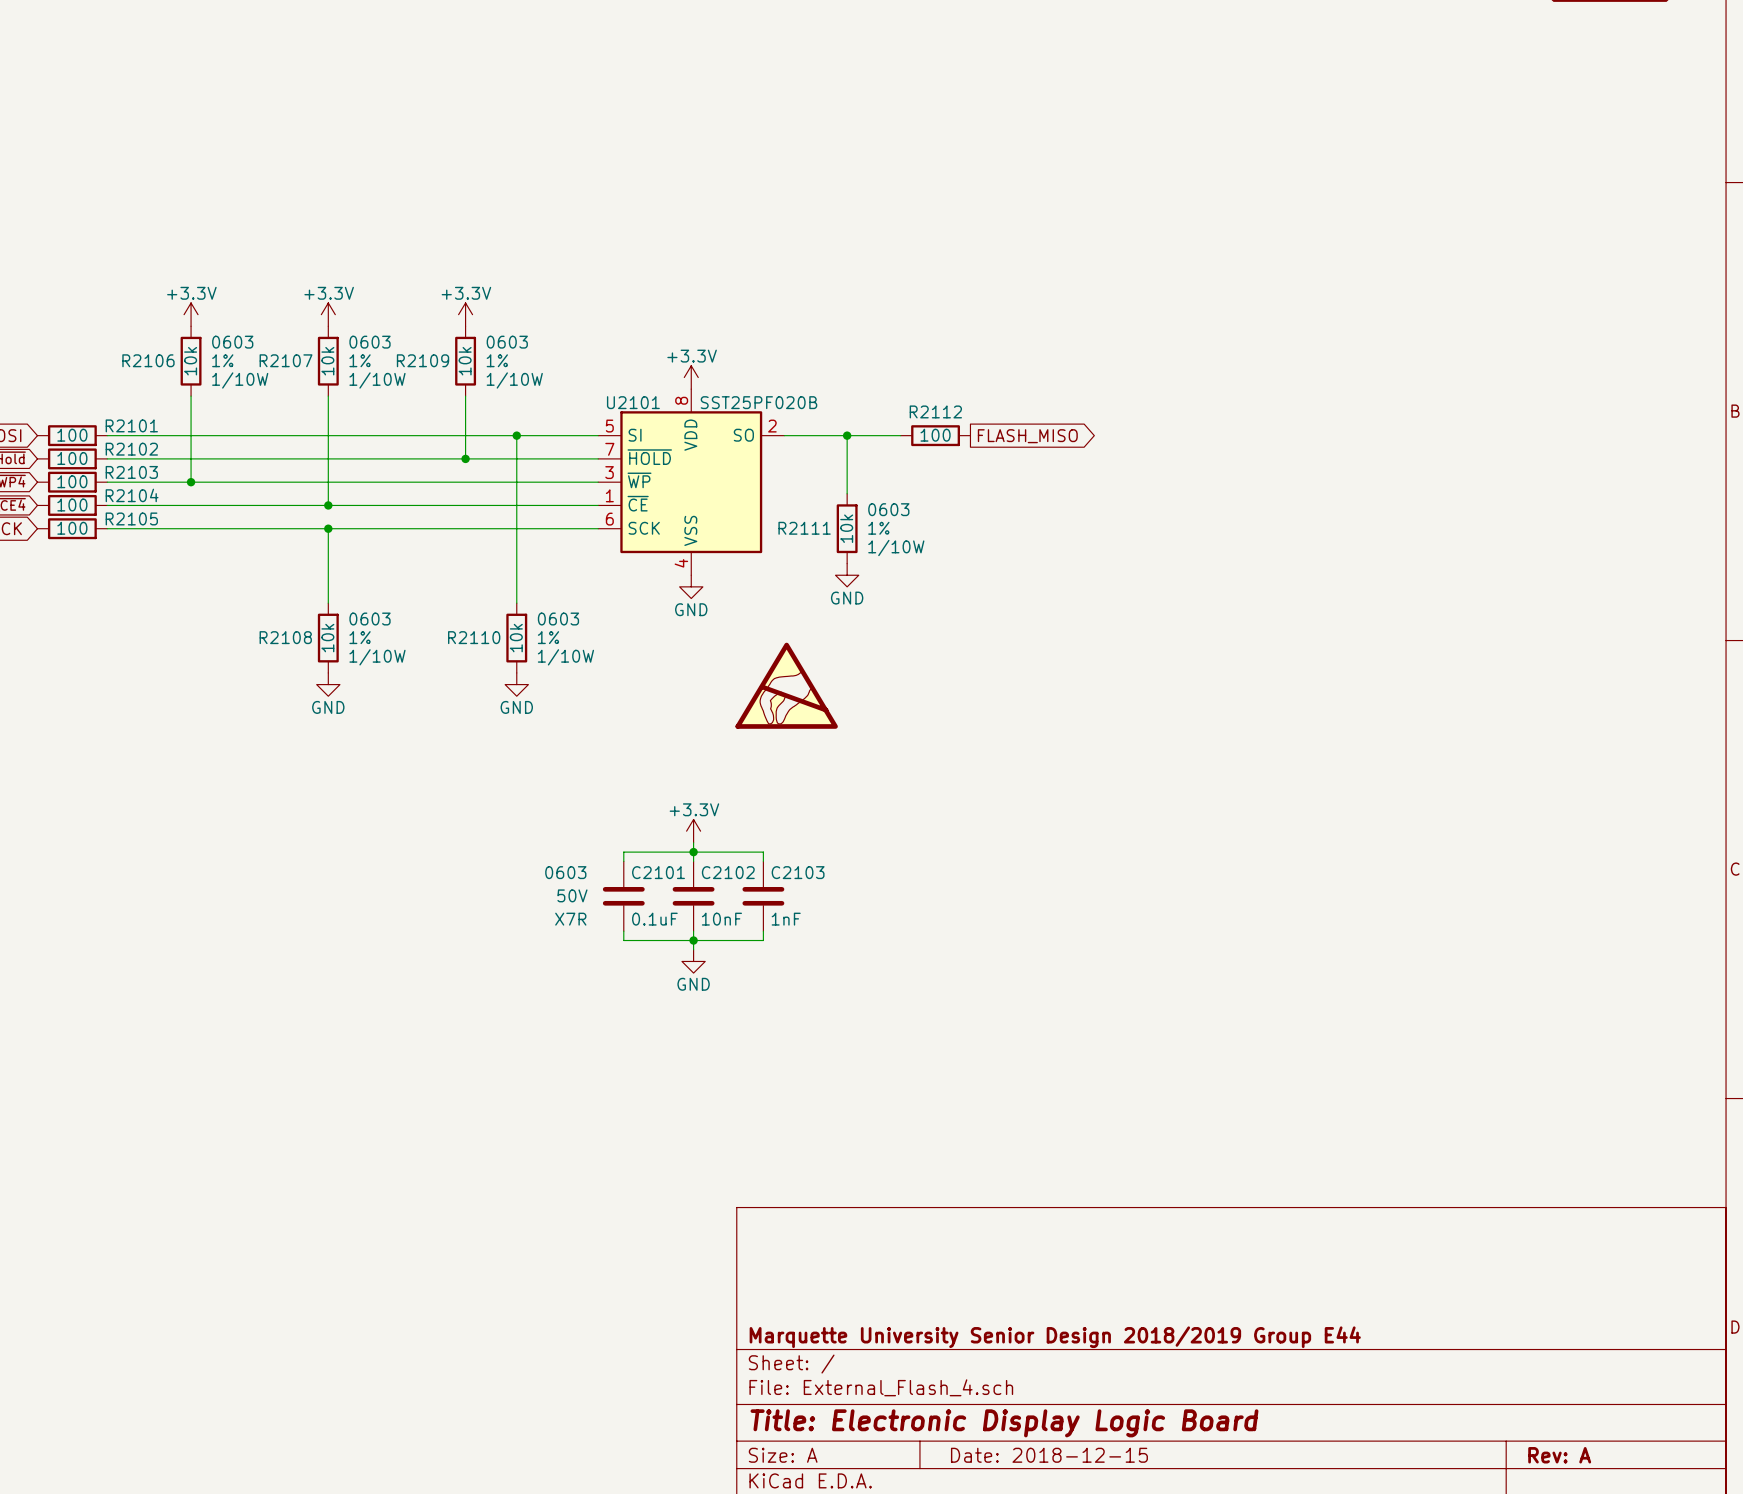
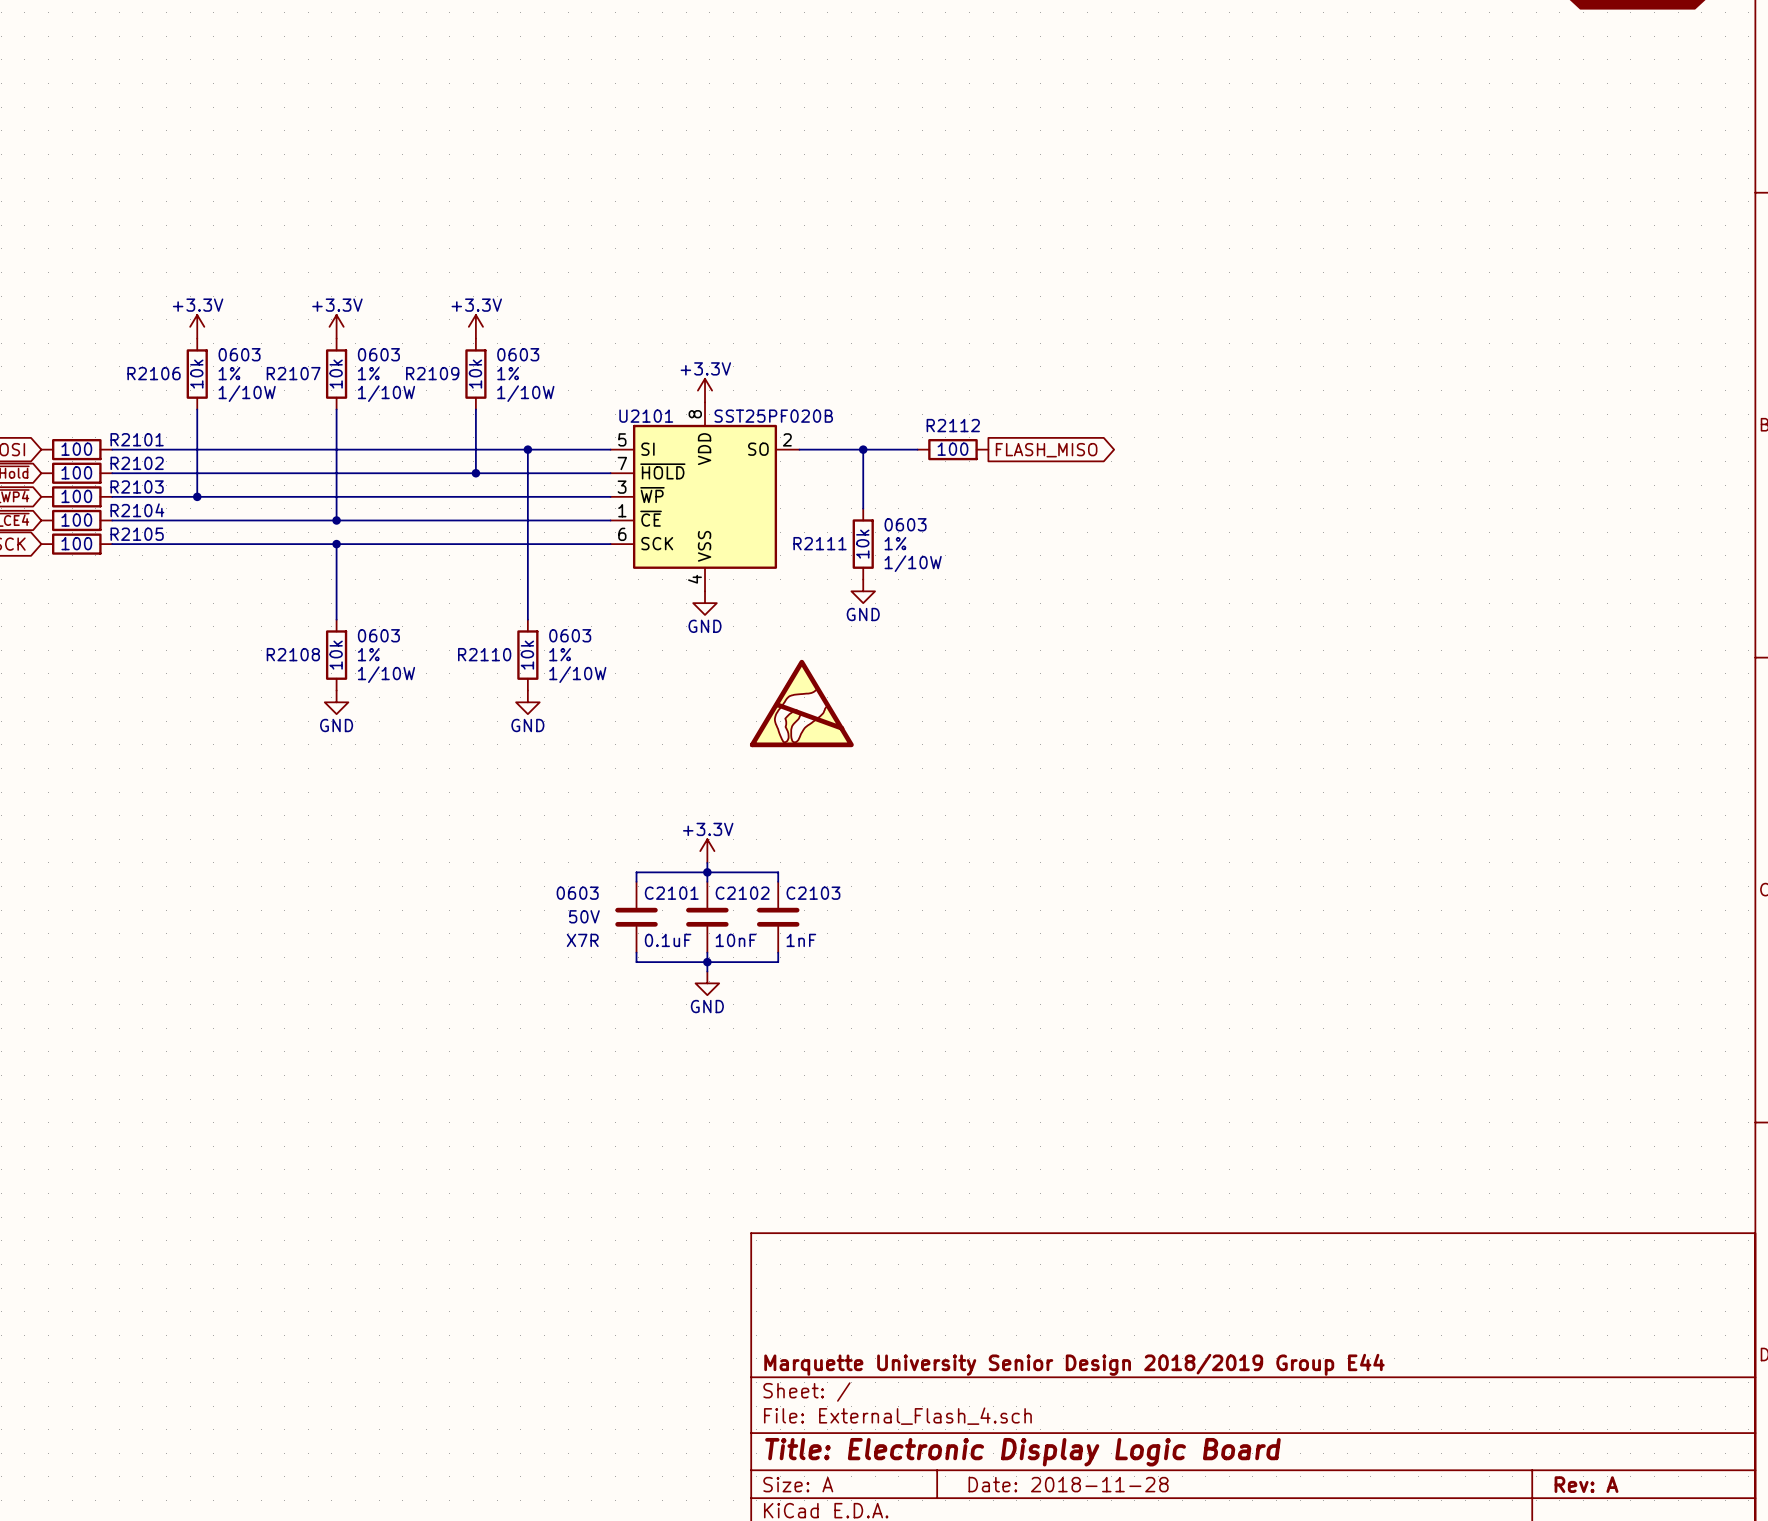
title block: Date: 2018-12-15 (1049, 1455) -> Date: 2018-11-28 (1068, 1484)

